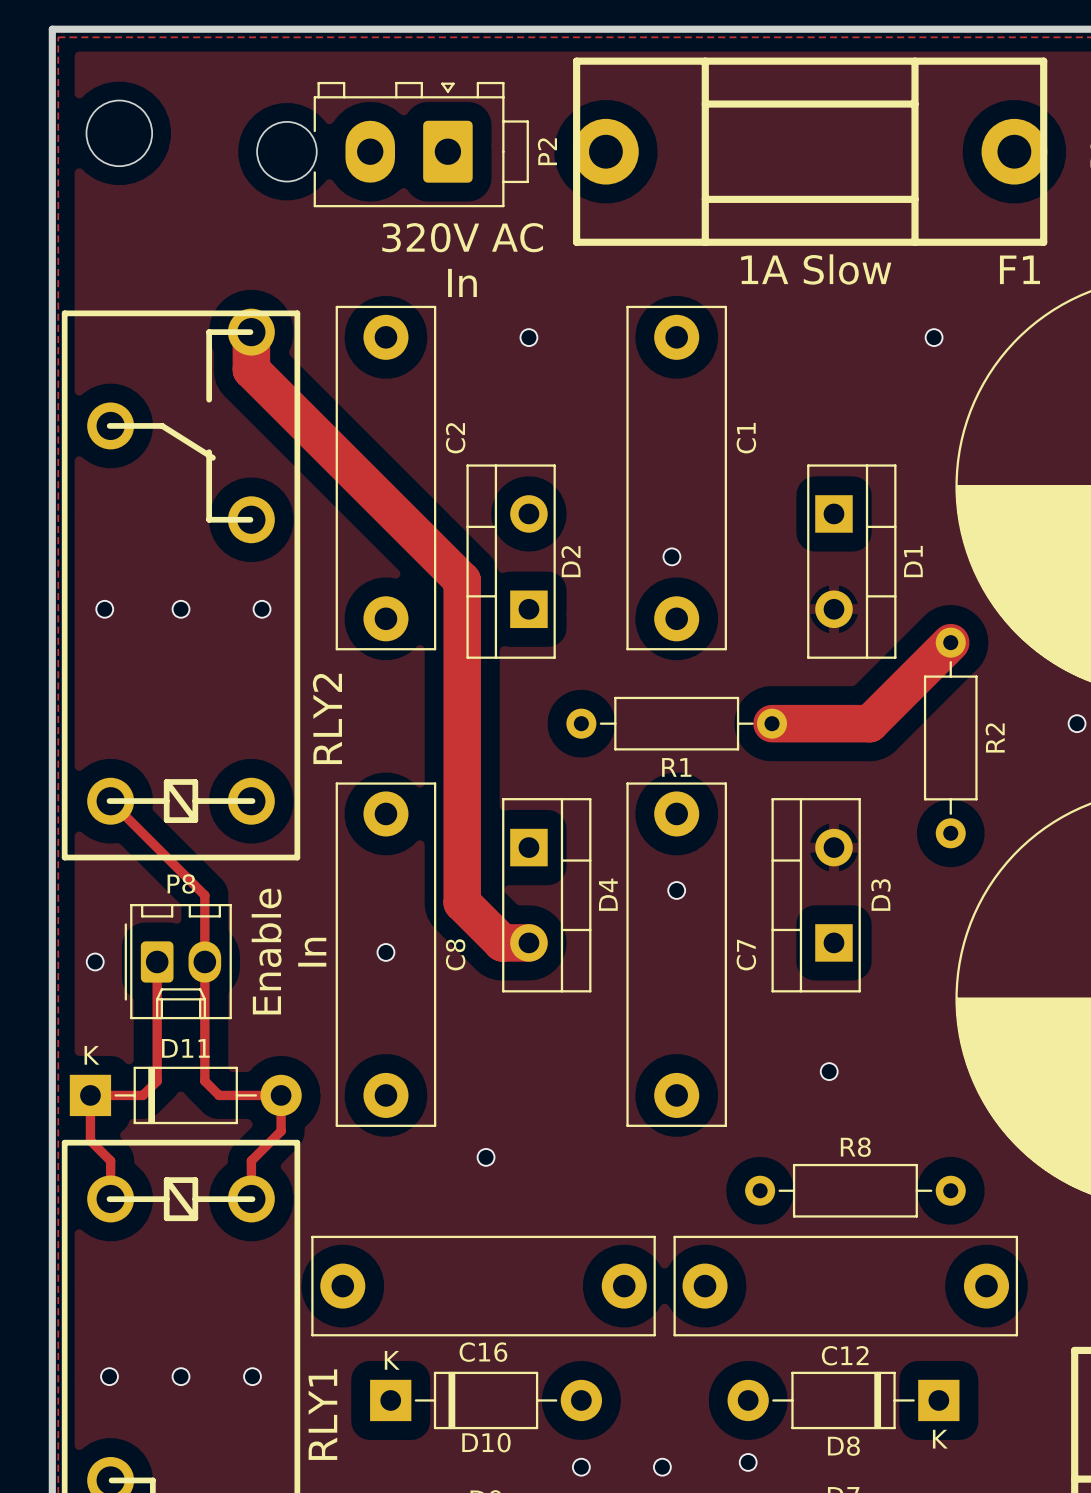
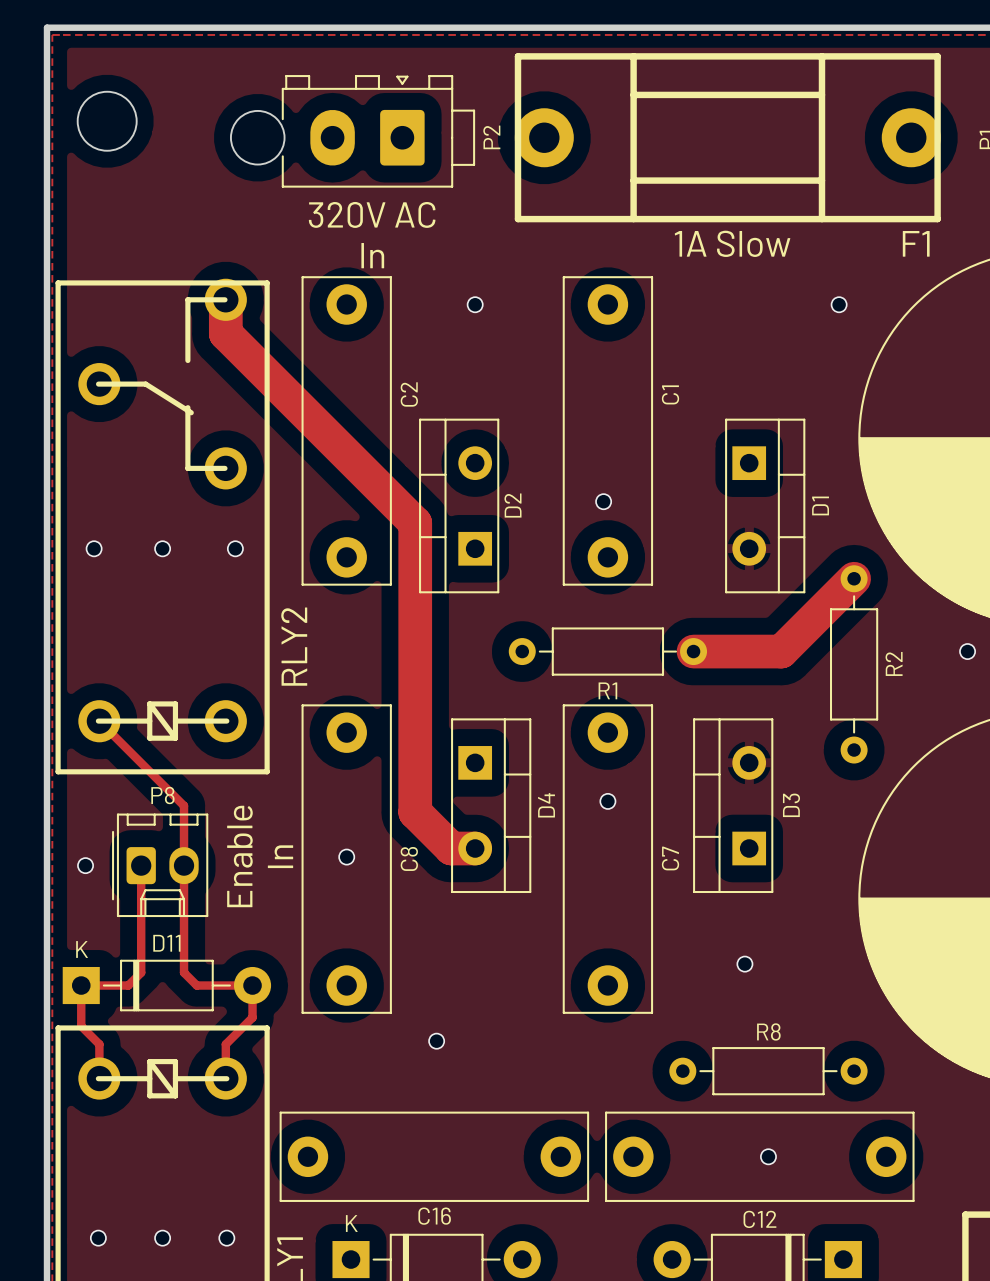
text position: 320V AC (462, 237) -> 320V AC (372, 214)
text position: In (462, 282) -> In (372, 255)
via: none -> (768, 1156)

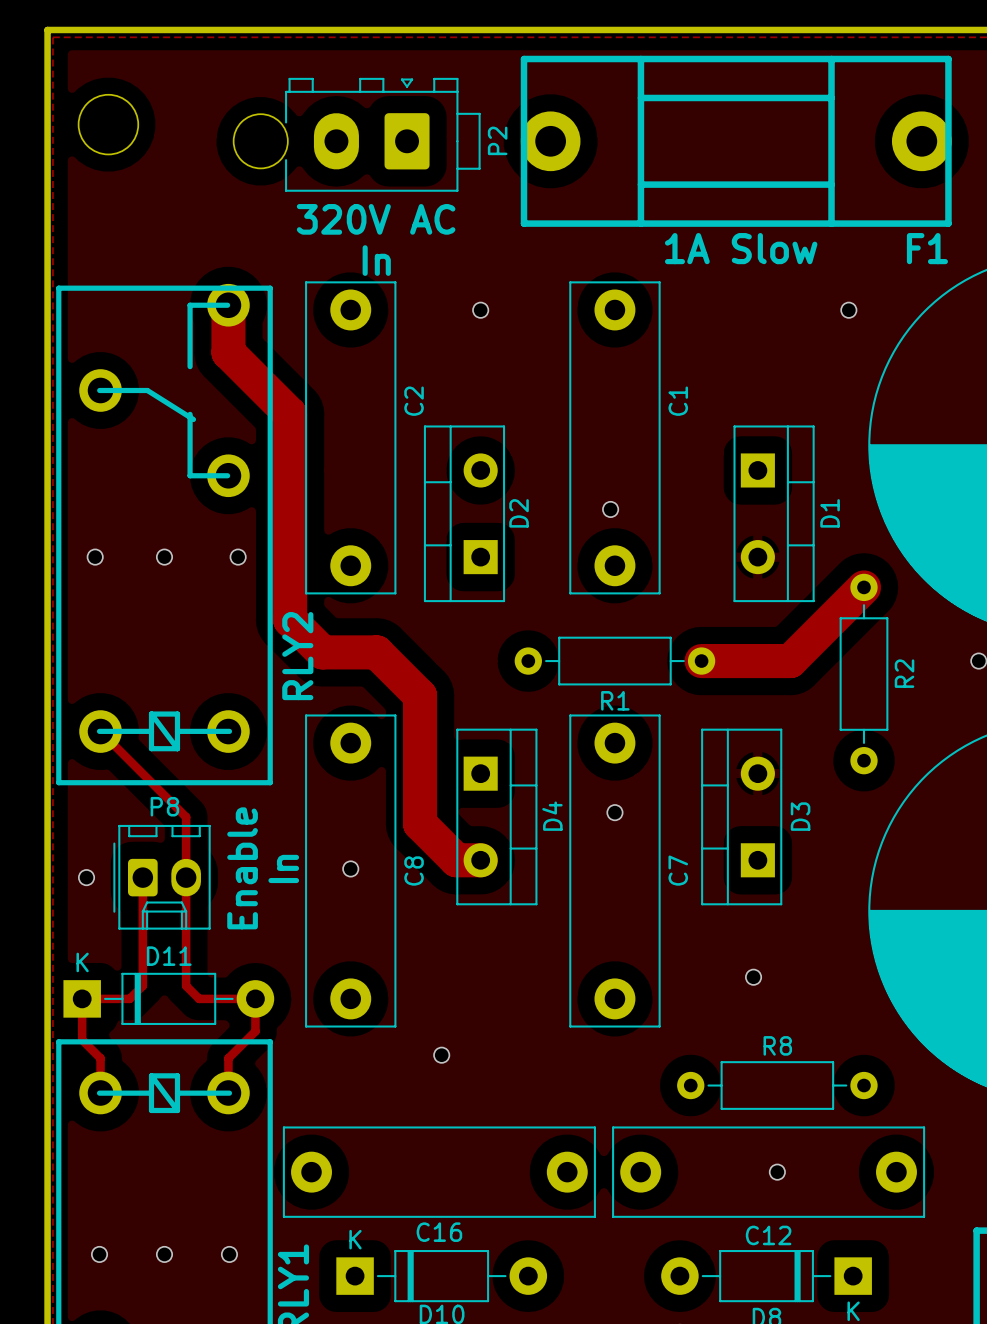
track: (225, 333) (415, 523) (415, 685) -> (228, 339) (228, 352) (290, 414) (290, 619) (322, 652) (376, 652) (420, 695)

